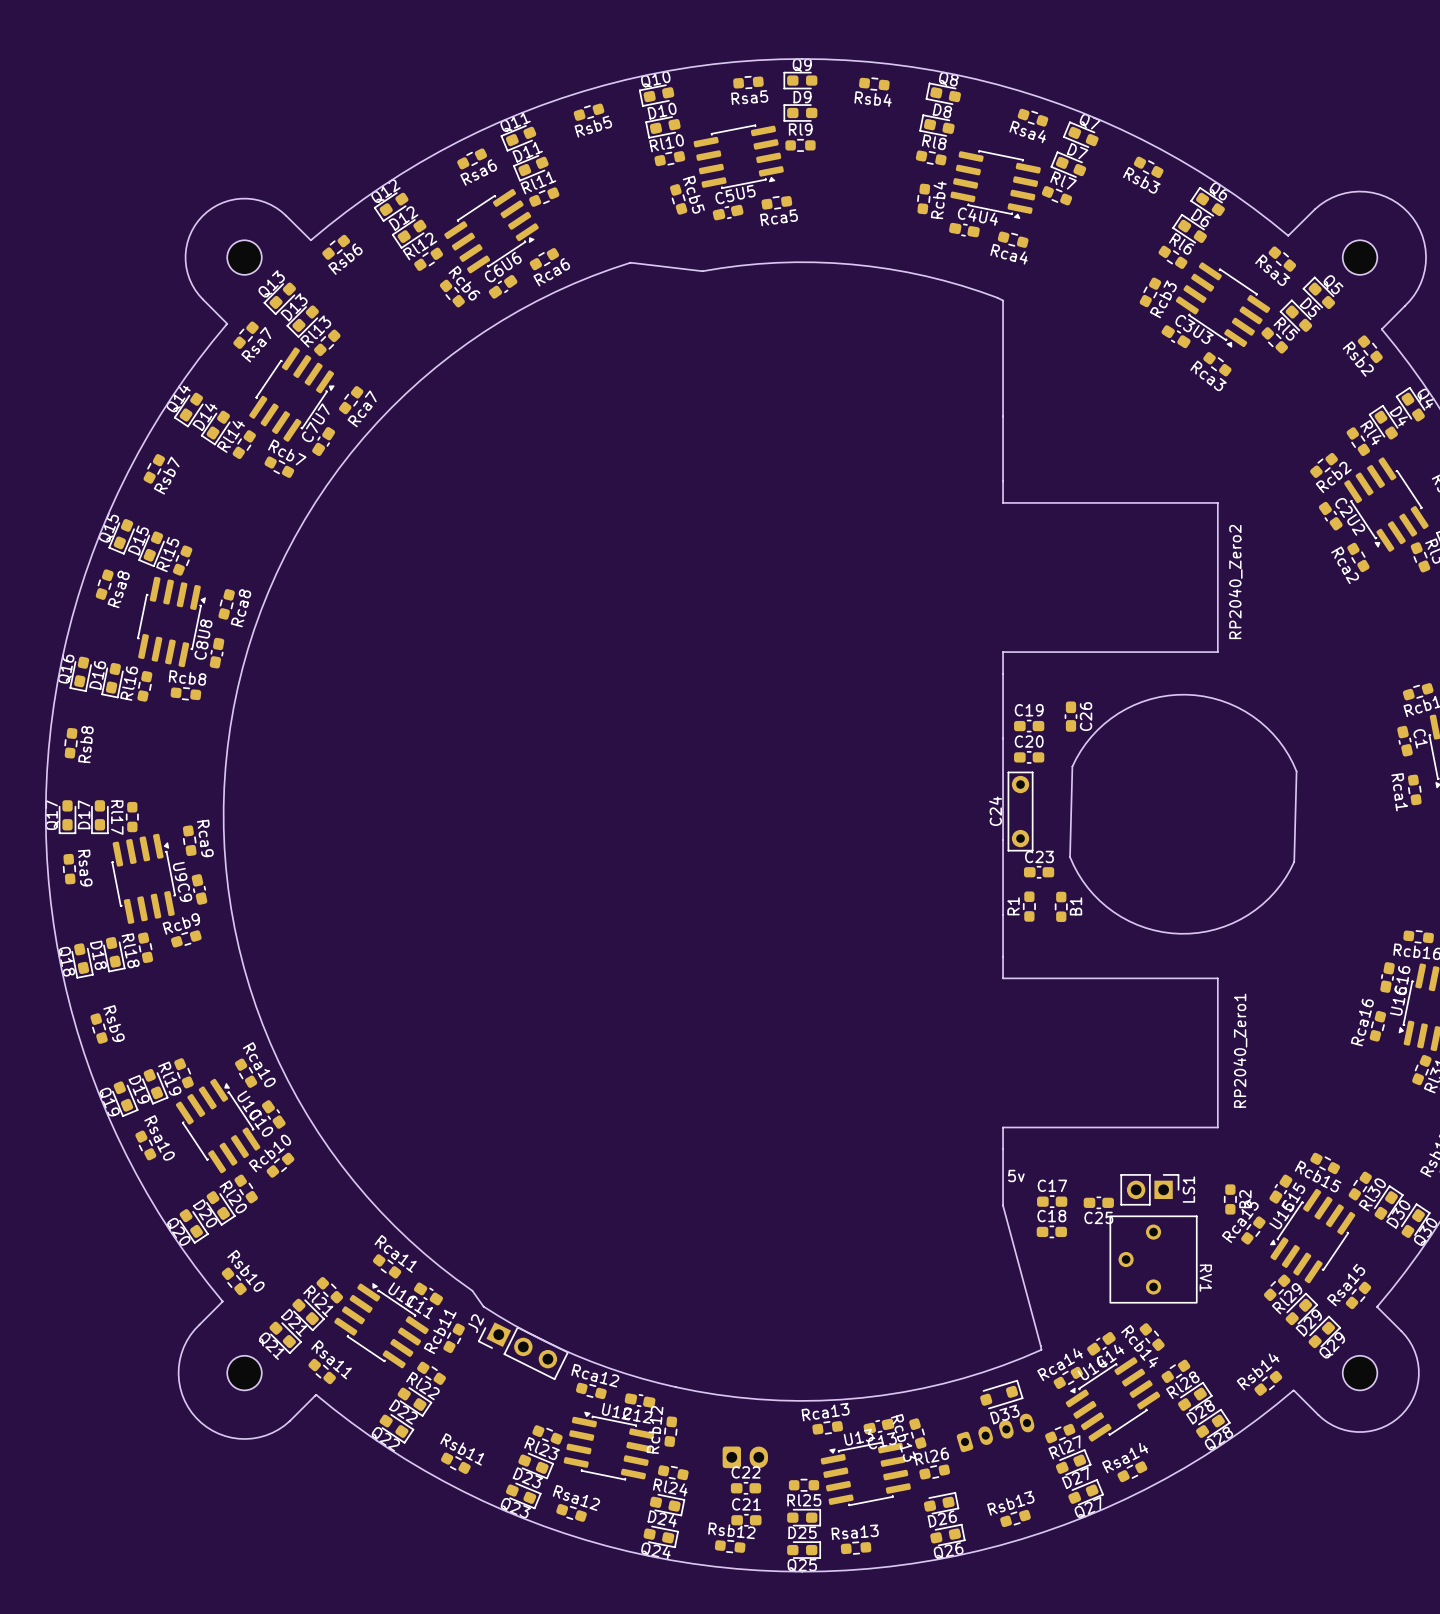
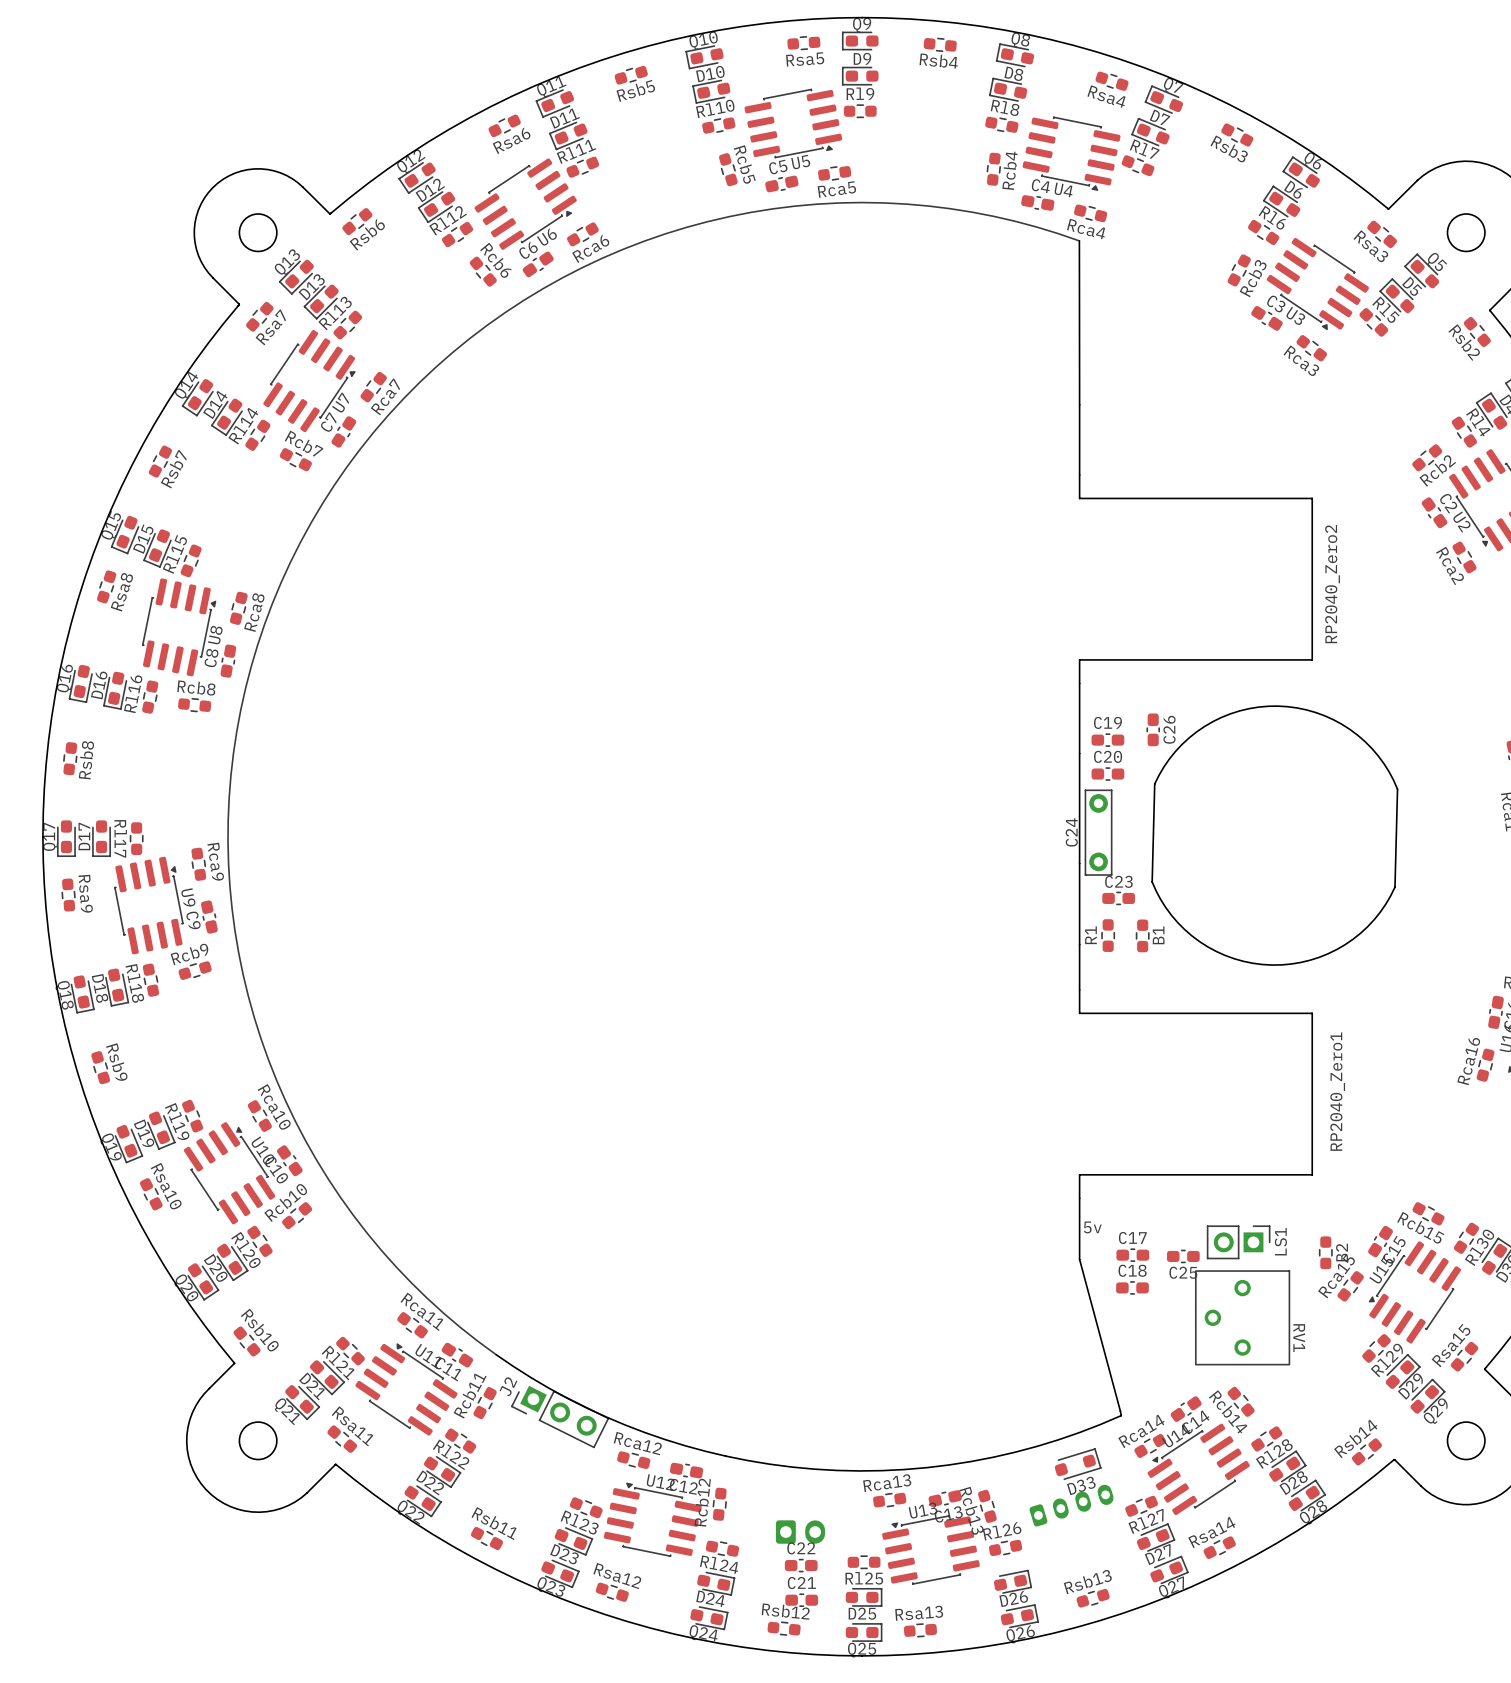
board edge: none -> (1079, 240) (1079, 404)
line: none -> (1079, 240) (1037, 227) (972, 212) (905, 204) (861, 202) (794, 206) (728, 216) (664, 234) (622, 249) (562, 277) (524, 300) (487, 325) (435, 367) (388, 414) (360, 449) (334, 485) (300, 542) (281, 582) (257, 645) (240, 709) (230, 775) (228, 820) (229, 886) (235, 930) (248, 996) (261, 1038) (285, 1100) (305, 1140) (340, 1197) (381, 1250) (411, 1282) (443, 1313) (496, 1354)
board edge: (1003, 416) (1003, 300) (997, 297) (925, 276) (851, 264) (776, 262) (702, 271) (630, 262) (573, 283) (519, 310) (451, 354) (405, 393) (363, 437) (315, 502) (276, 573) (254, 629) (237, 687) (227, 747) (223, 807) (226, 868) (234, 928) (249, 986) (270, 1043) (297, 1098) (329, 1149) (367, 1196) (424, 1253) (472, 1290) (483, 1306) (528, 1333) (576, 1355) (625, 1373) (676, 1387) -> (496, 1354) (549, 1388) (605, 1416) (664, 1439) (725, 1456)

